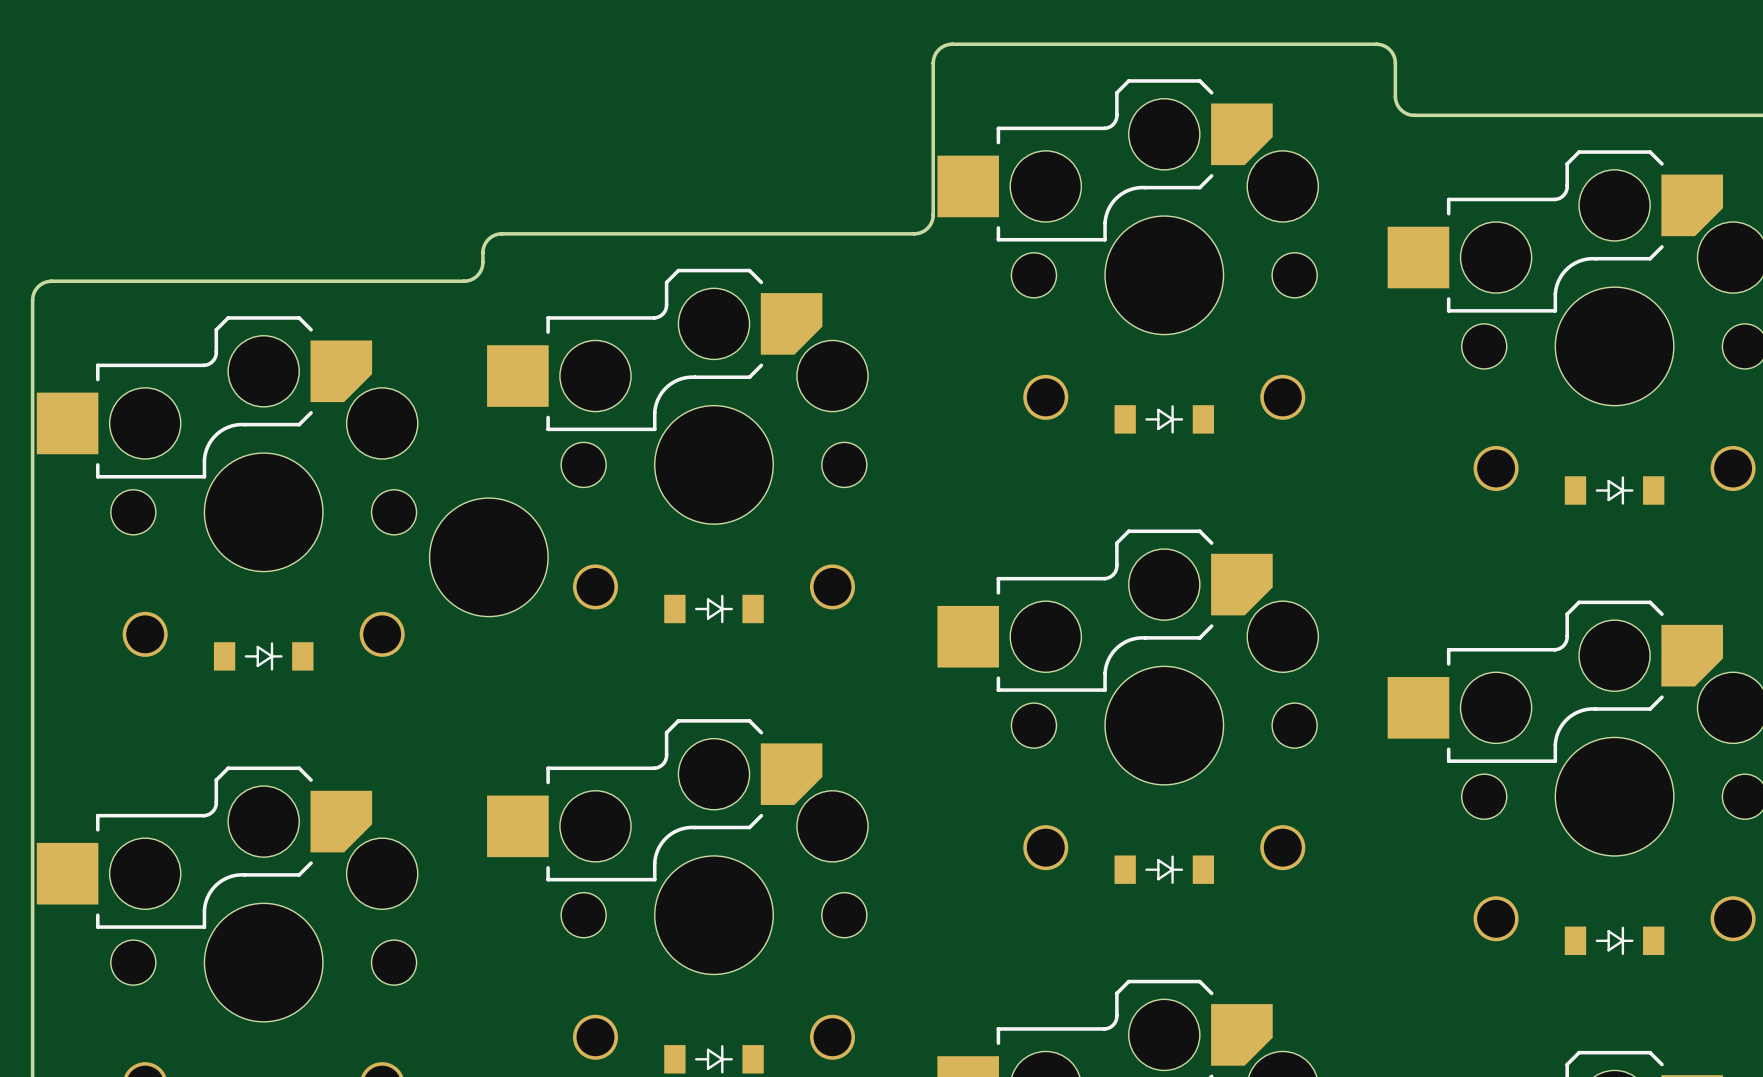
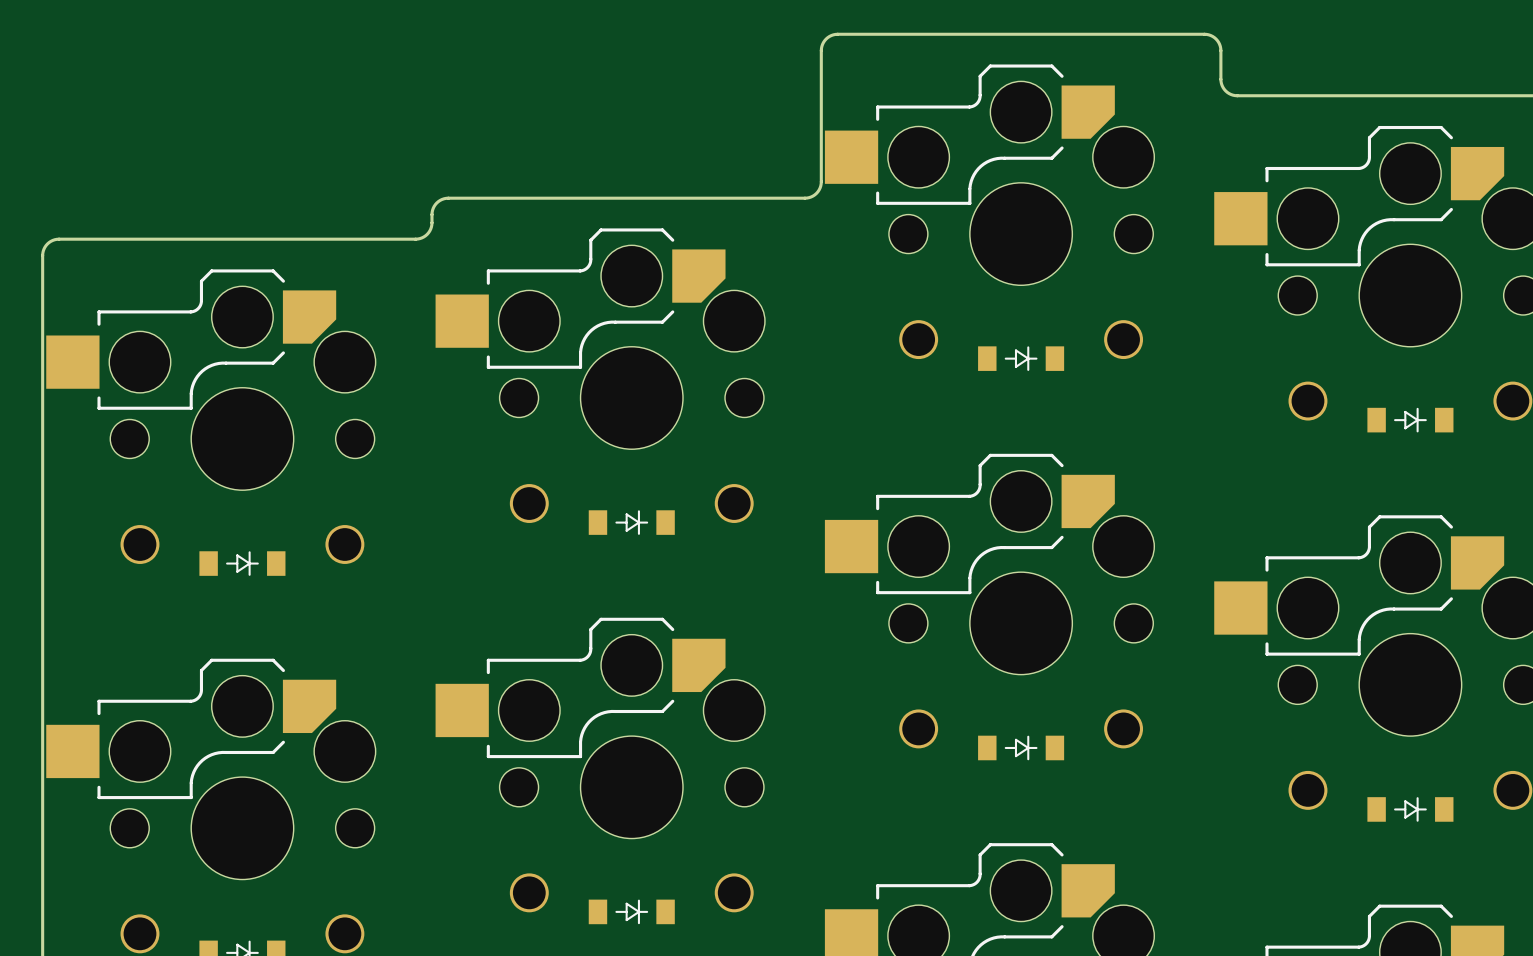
part: (488, 557) -> none

